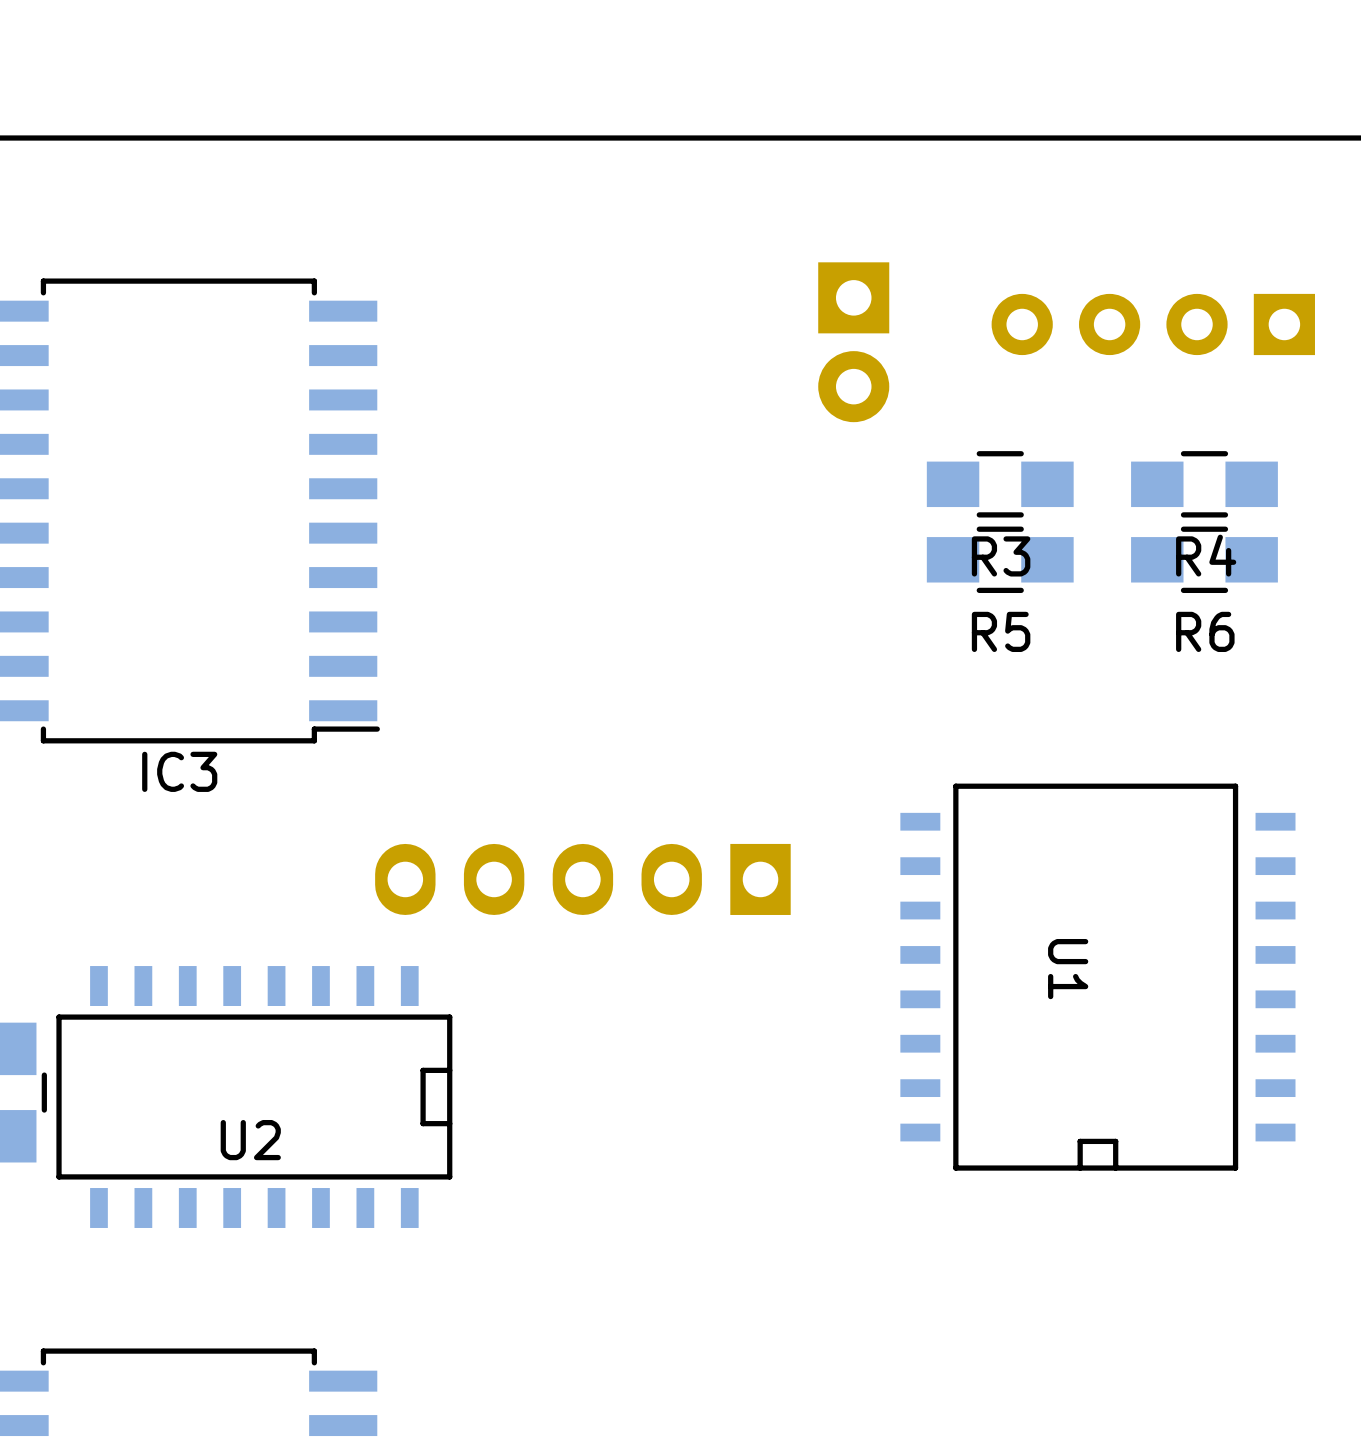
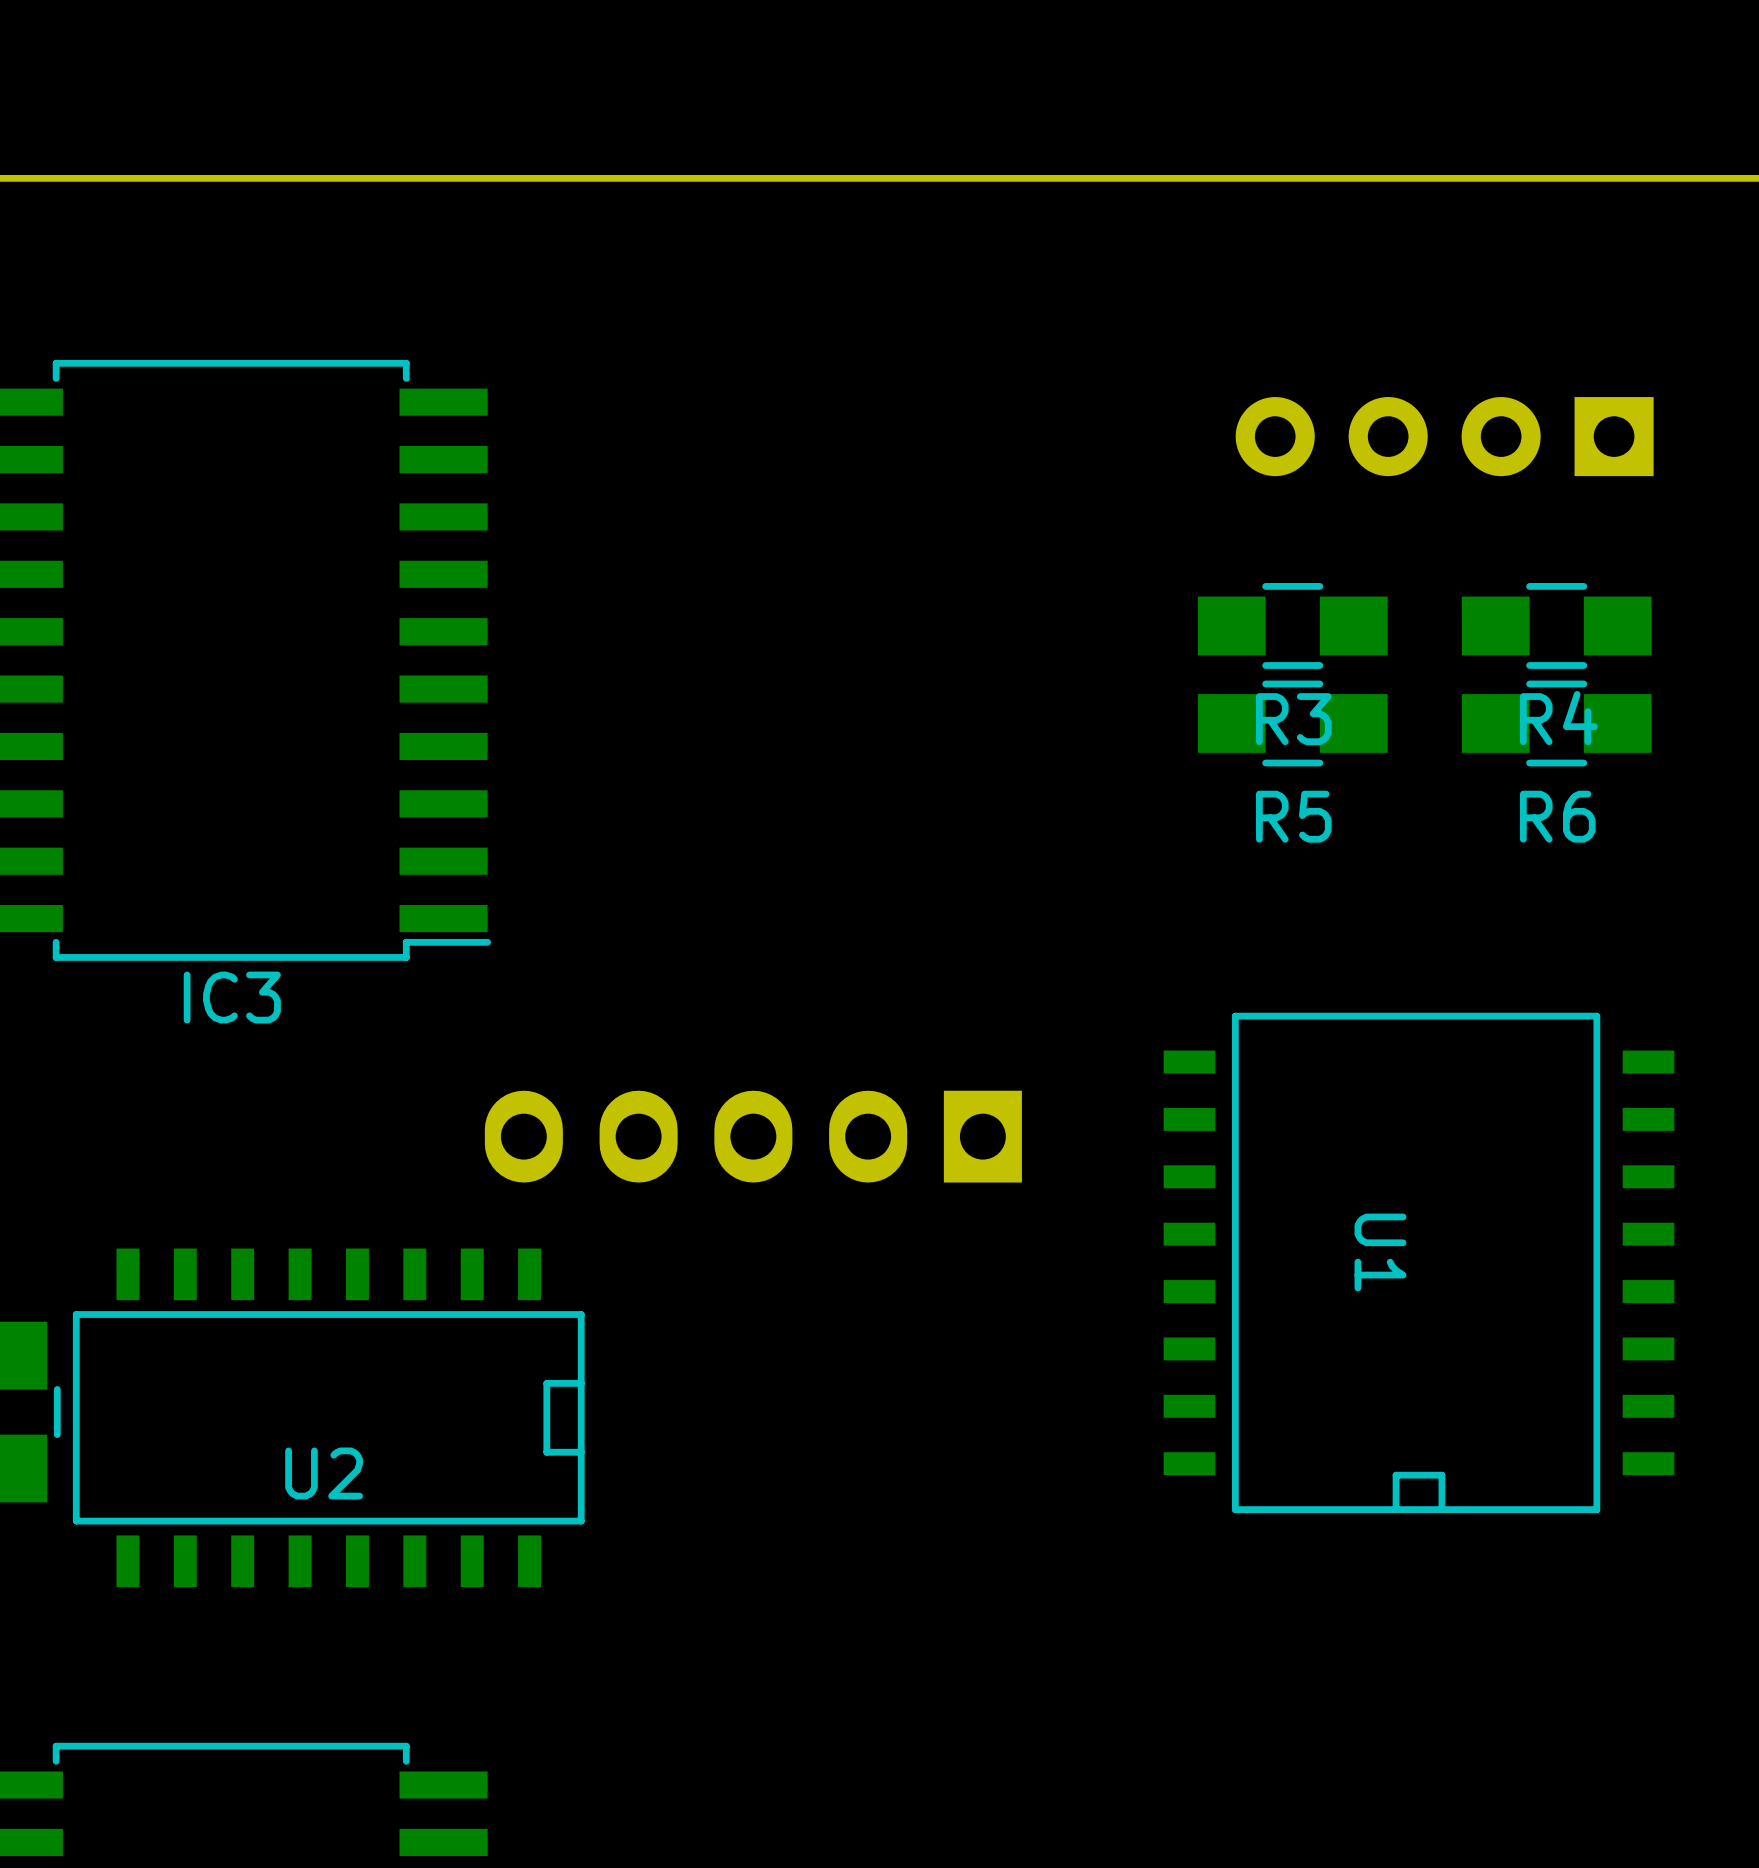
part position: (1153, 324) -> (1444, 436)
part: (853, 342) -> none

